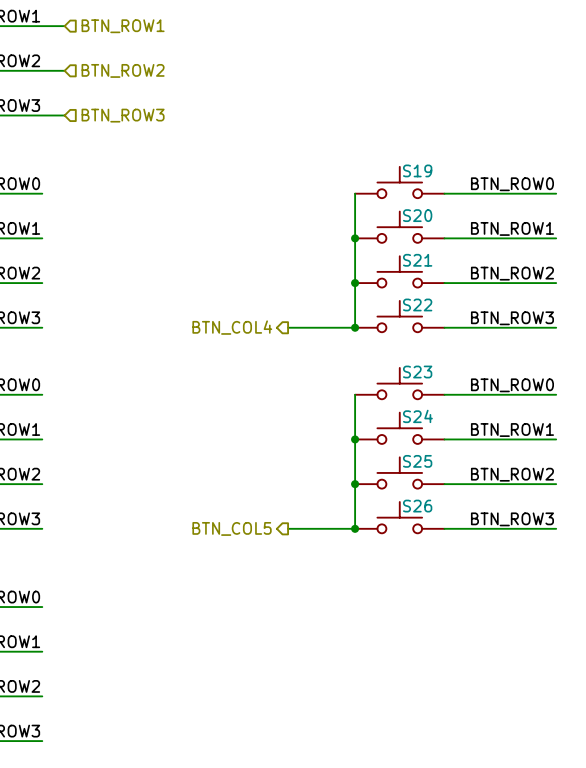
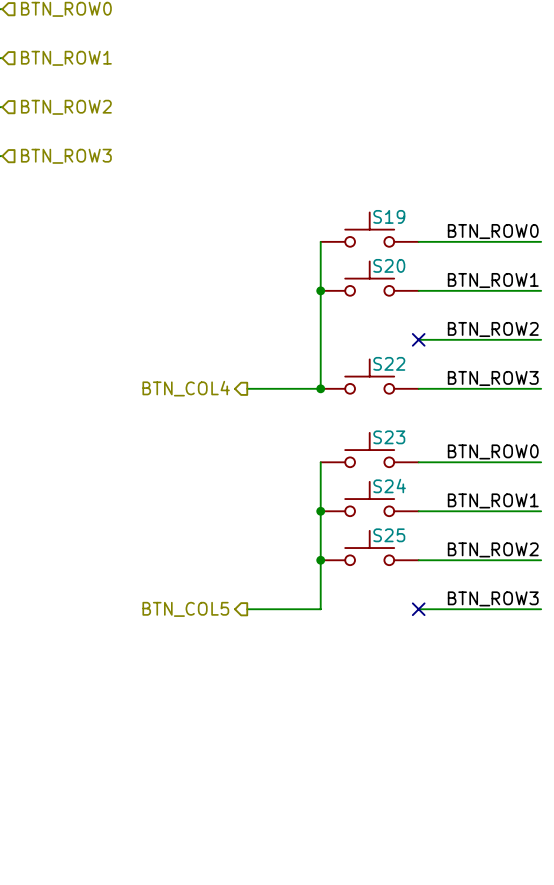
S21: (399, 271) -> none
junction: (355, 283) -> none
no-connect mark: none -> (418, 339)
S26: (399, 517) -> none
junction: (355, 528) -> none
no-connect mark: none -> (418, 609)

